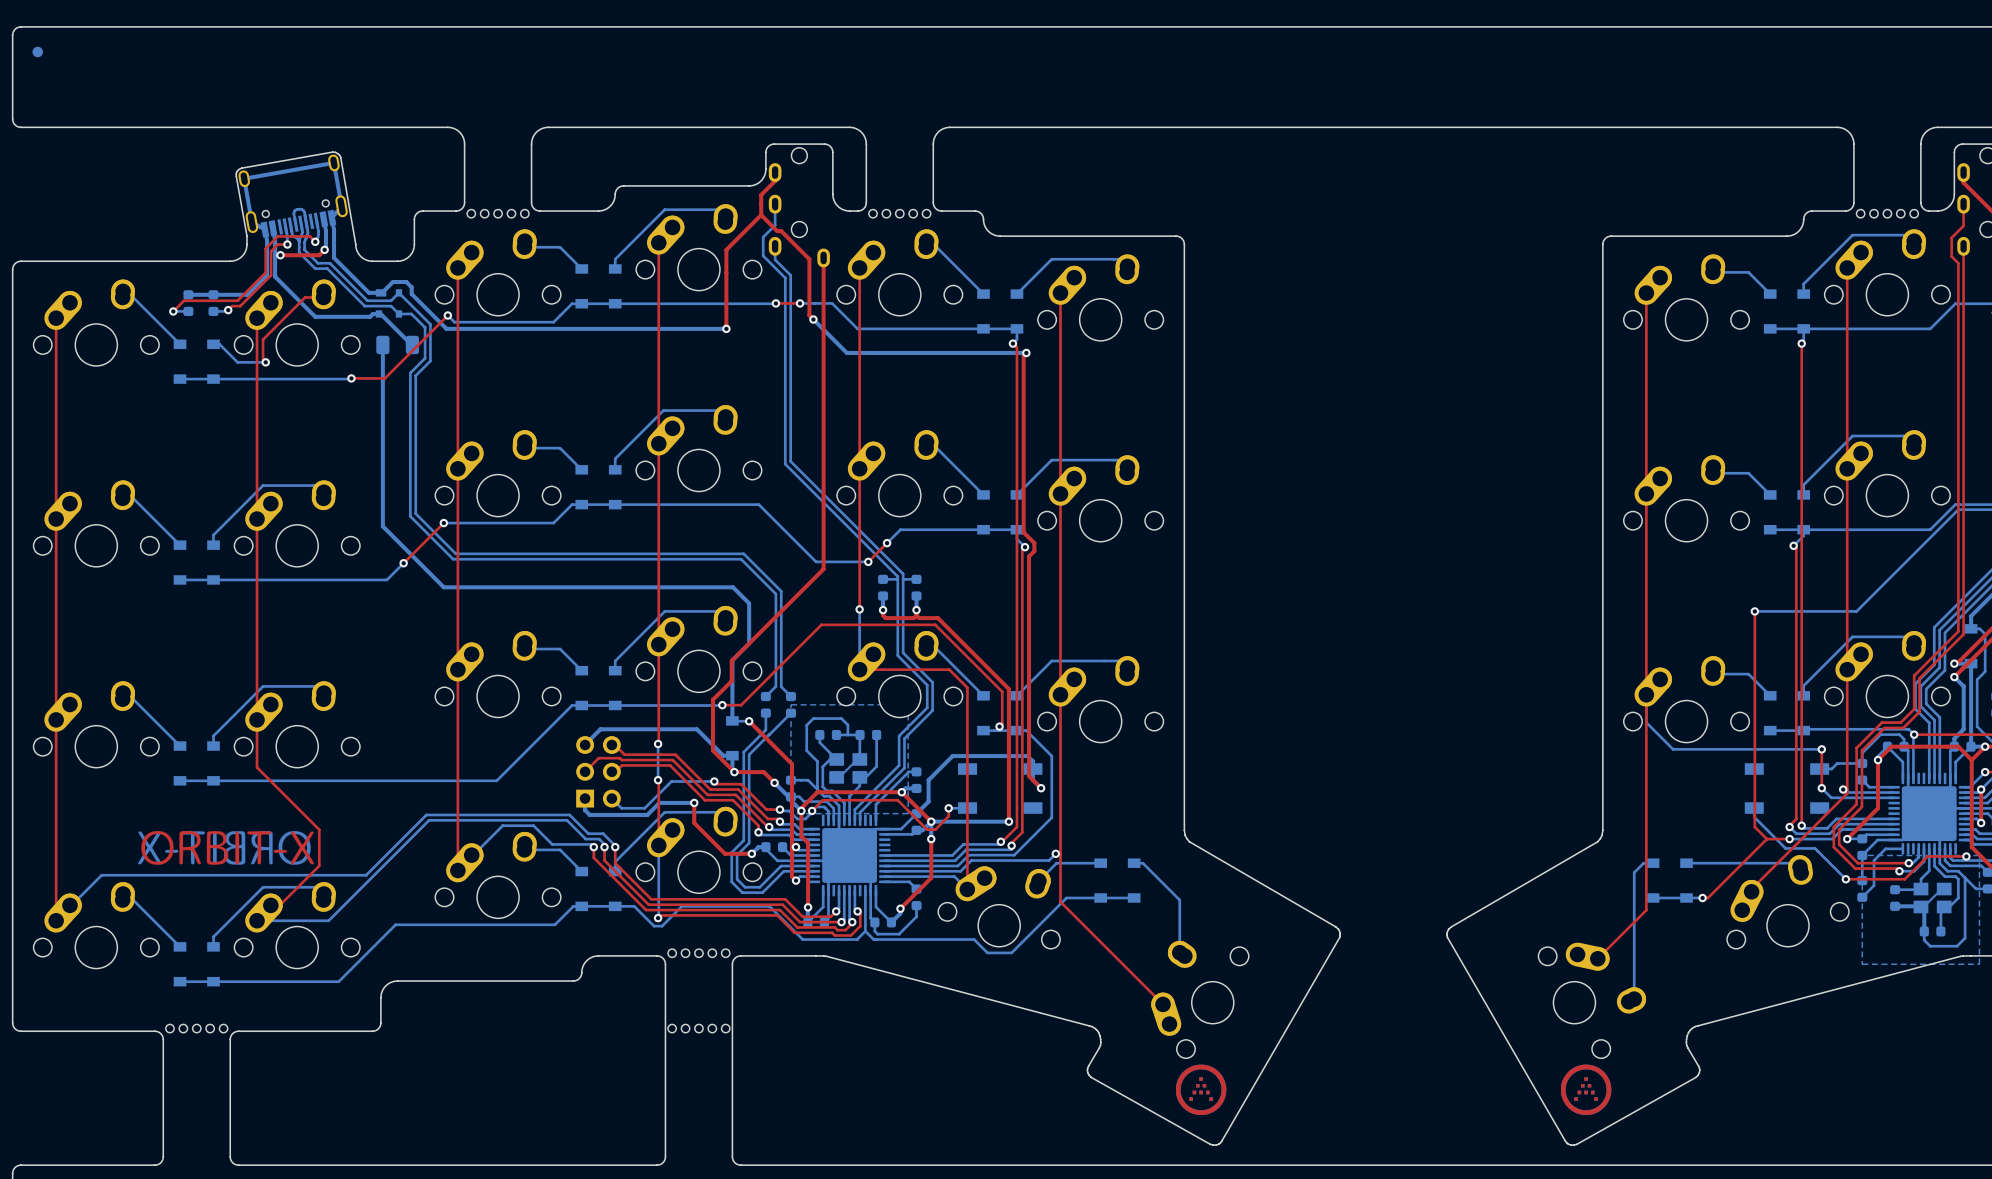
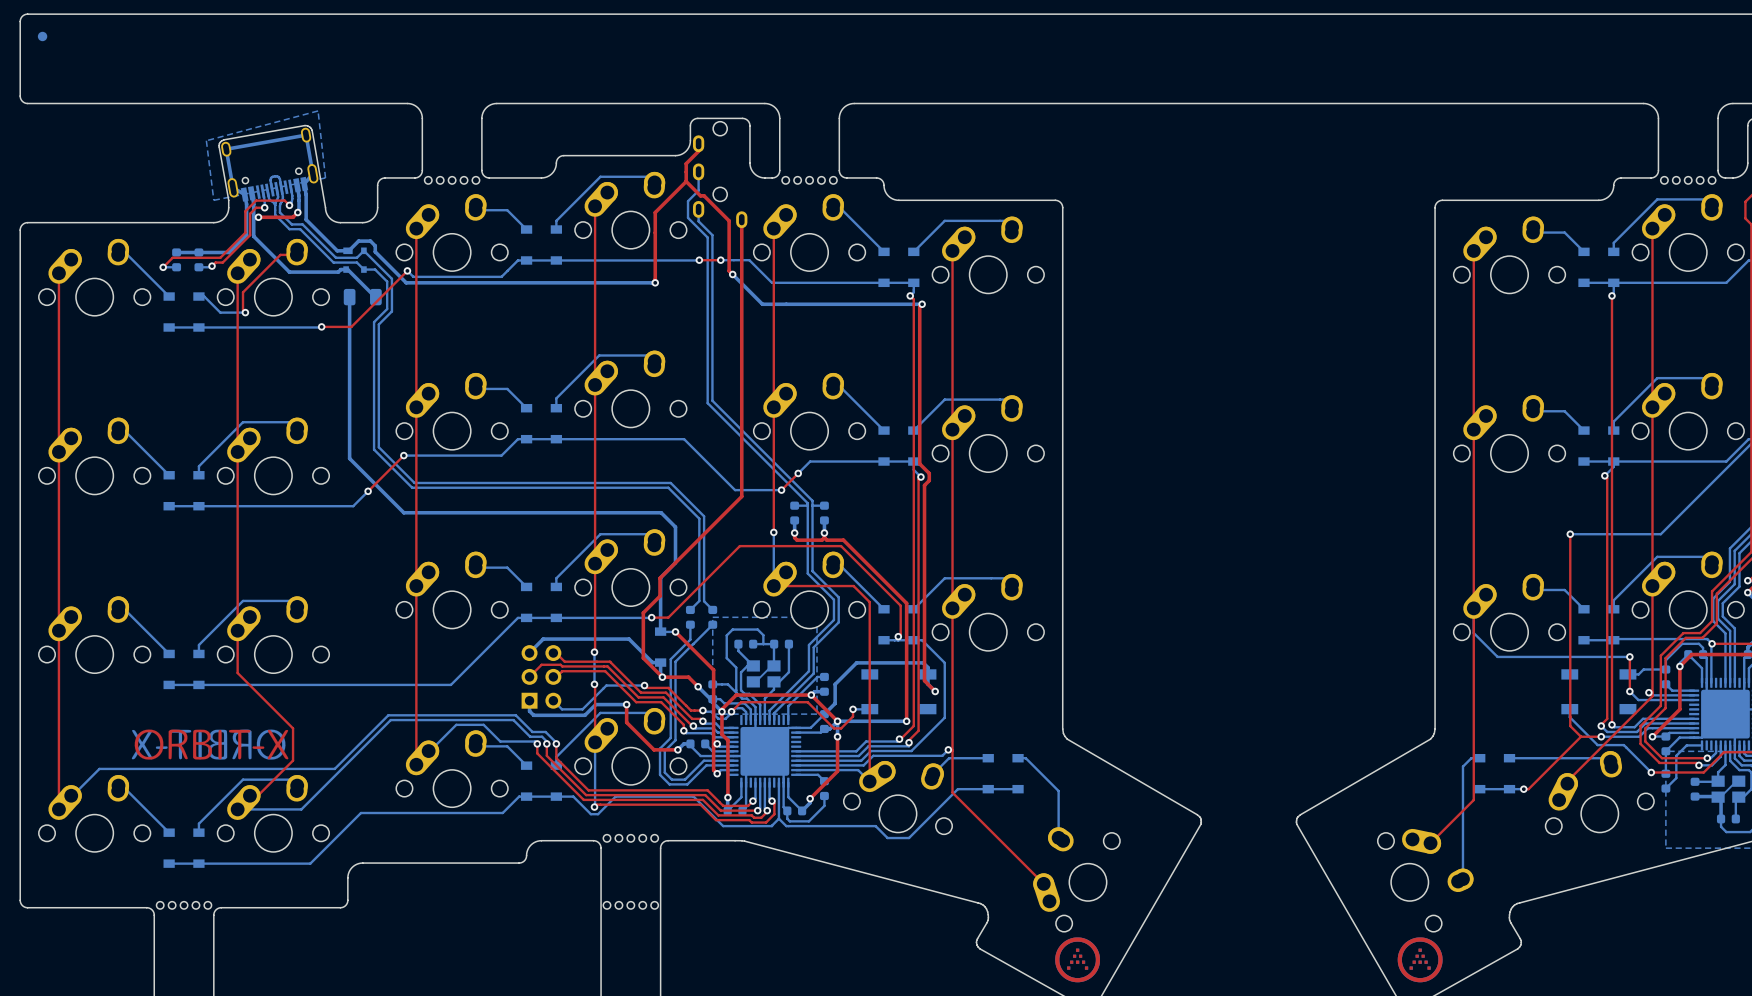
bottom zone outline: none -> (318, 110) (325, 177) (213, 200) (206, 140) (318, 110)

